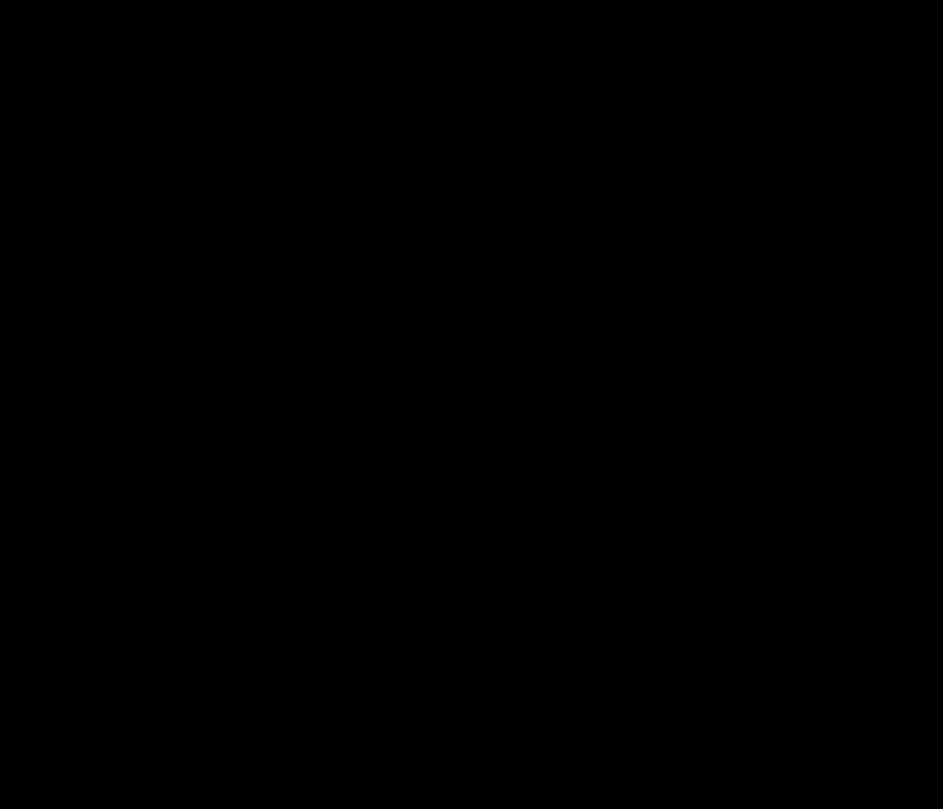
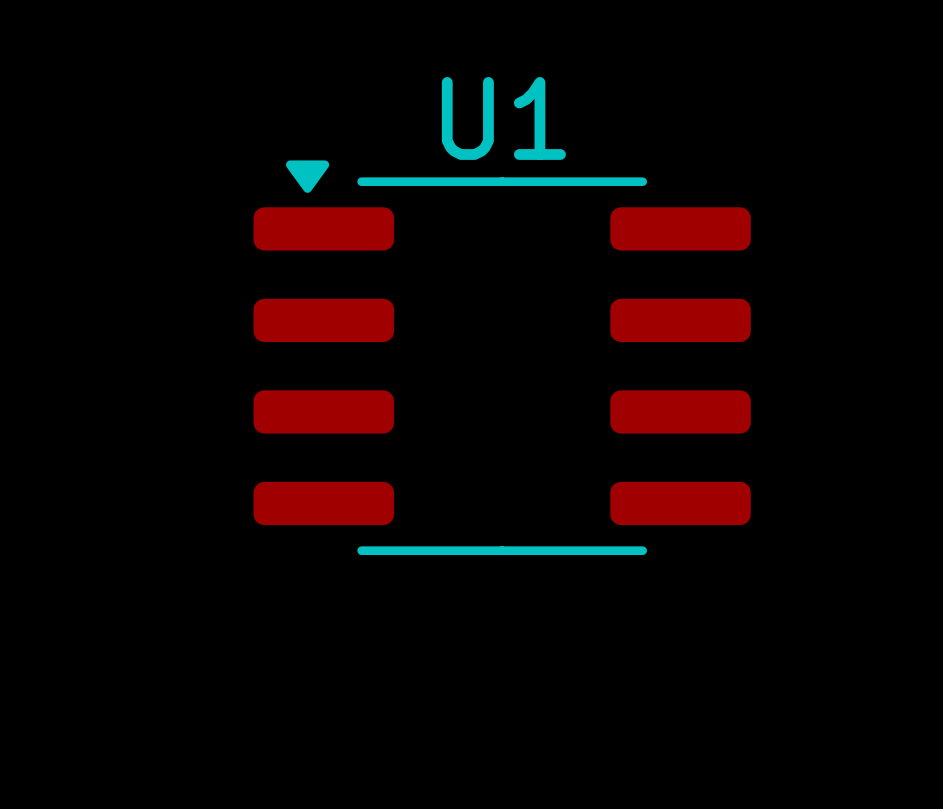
U1: none -> (502, 357)

